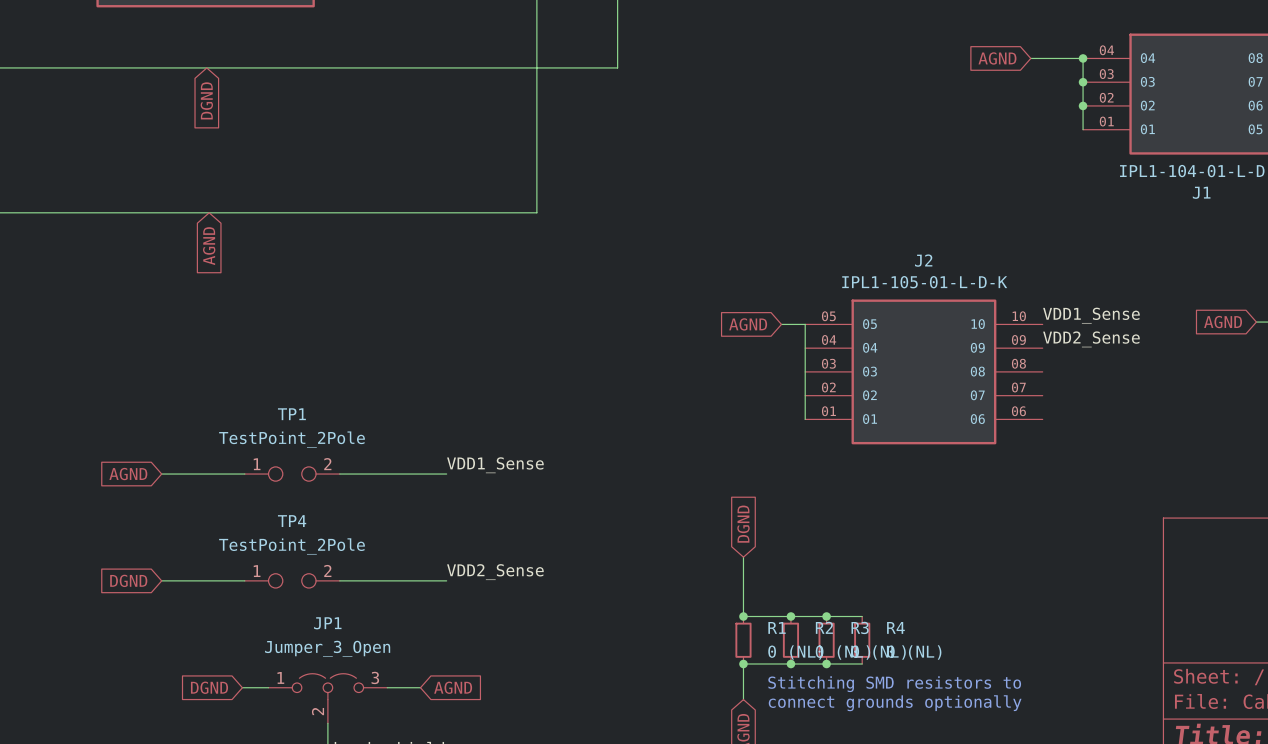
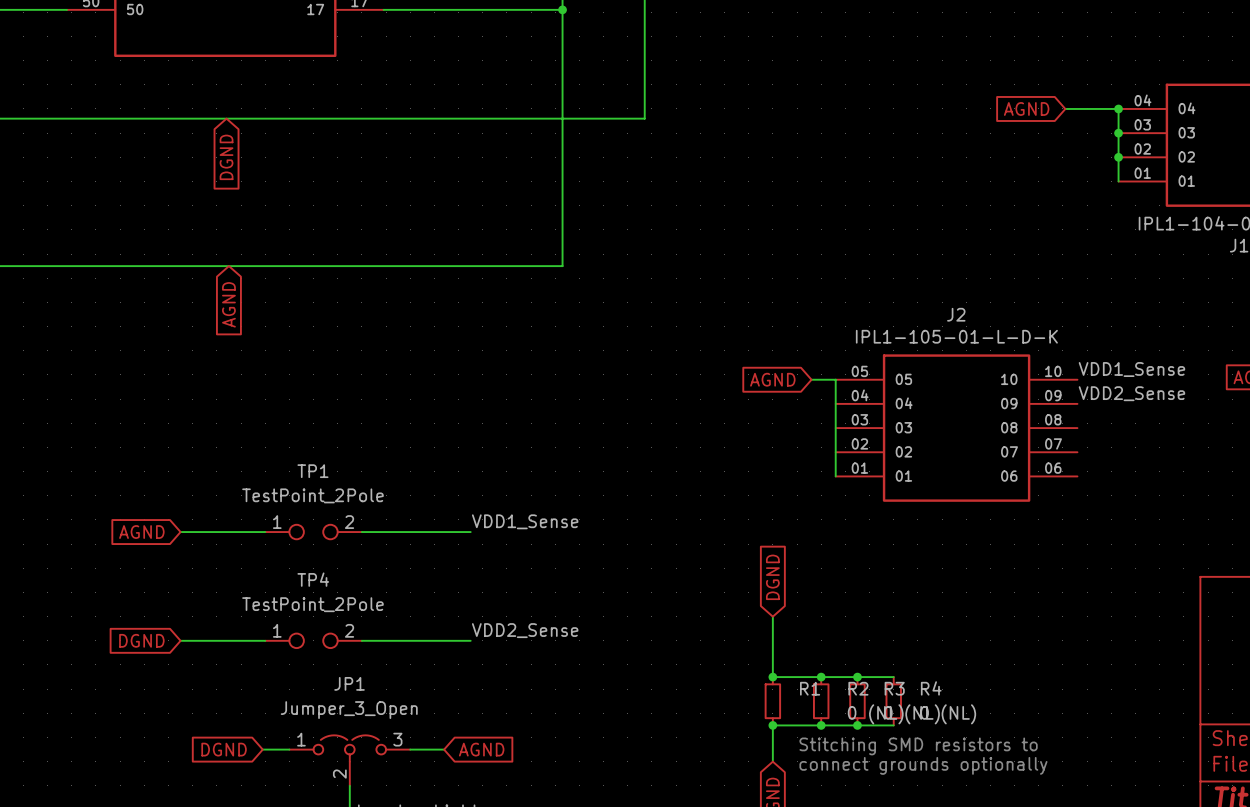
R1 value: 0 (NL) (795, 652) -> none

